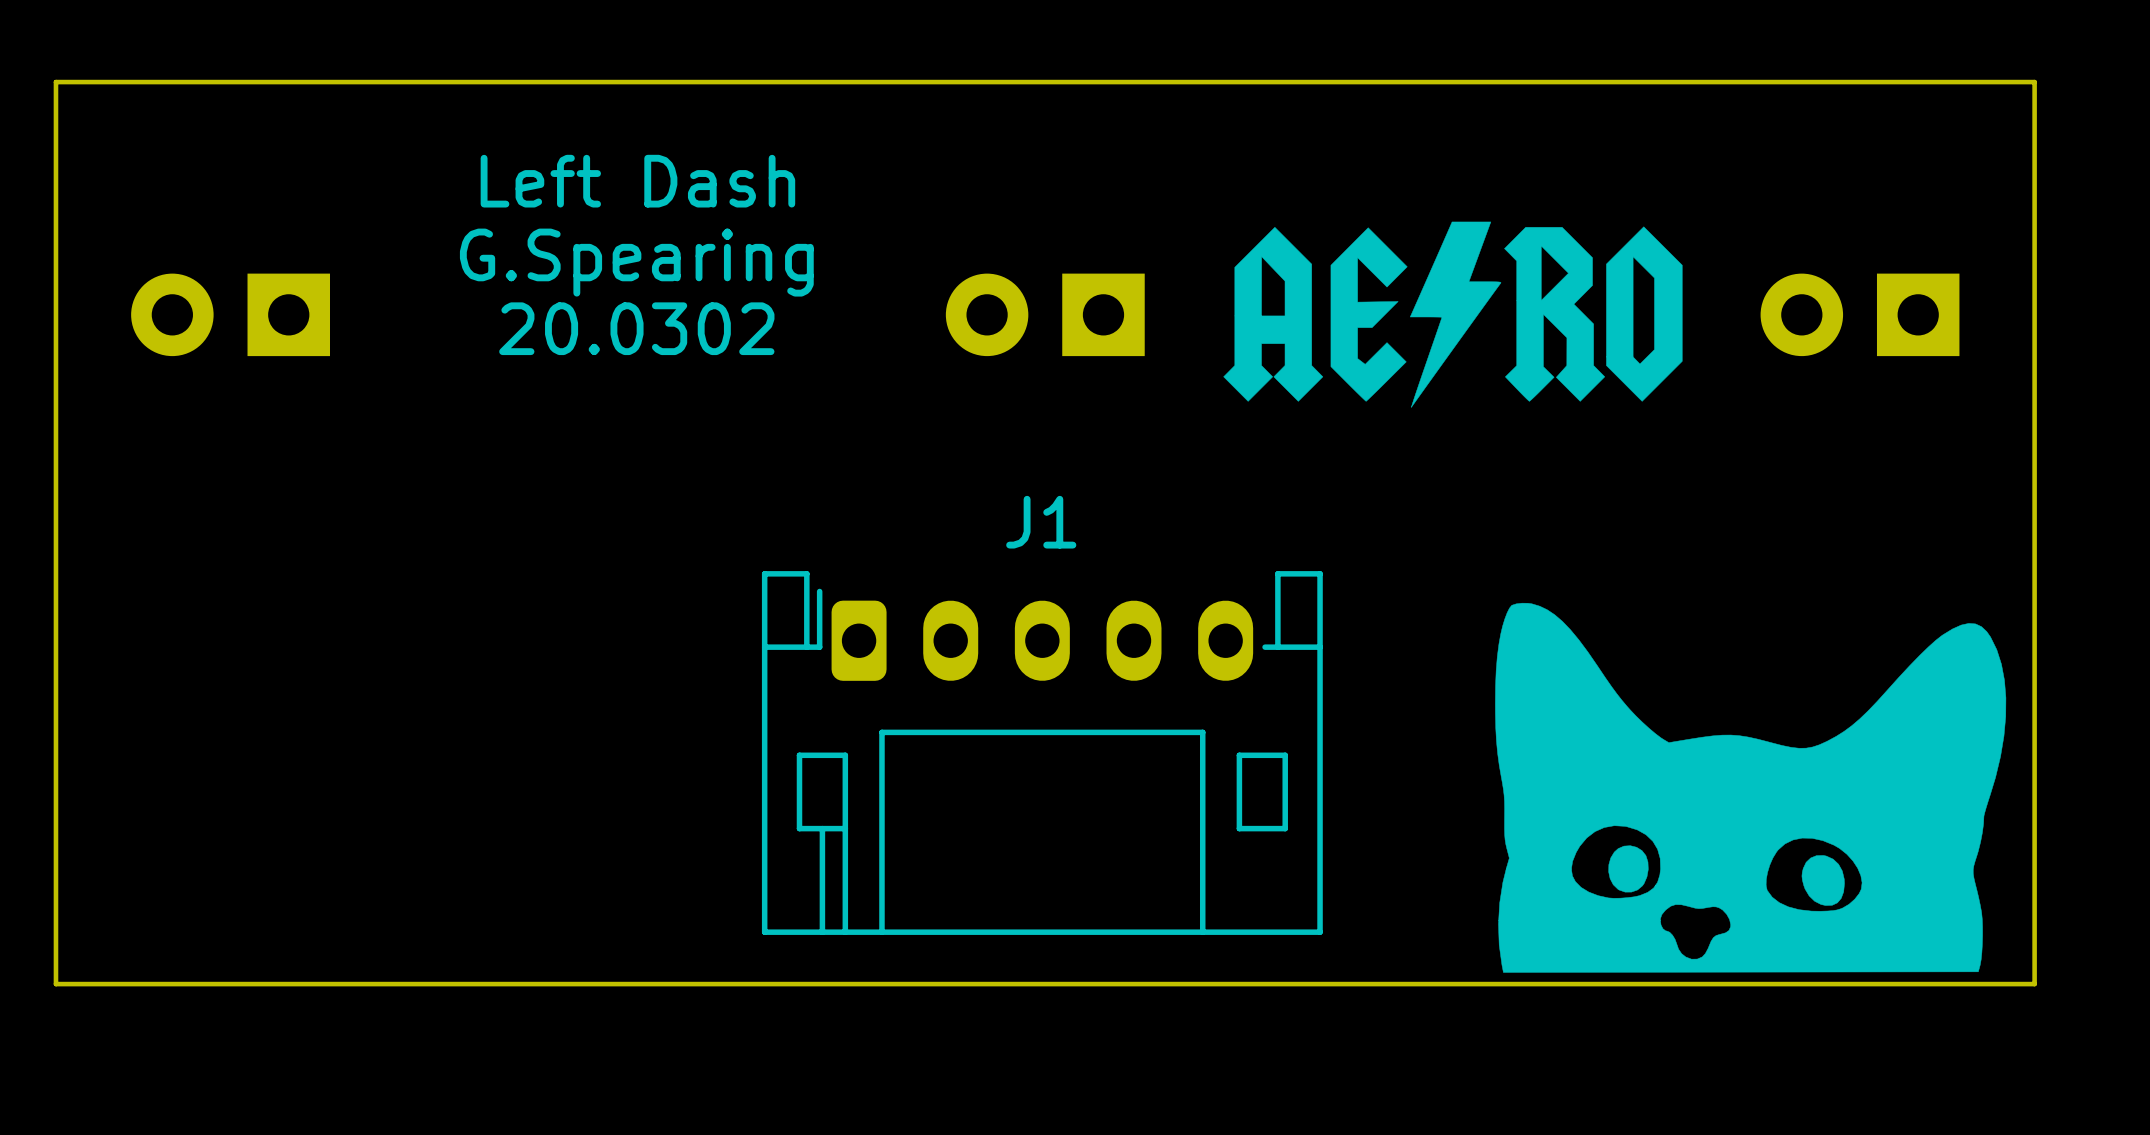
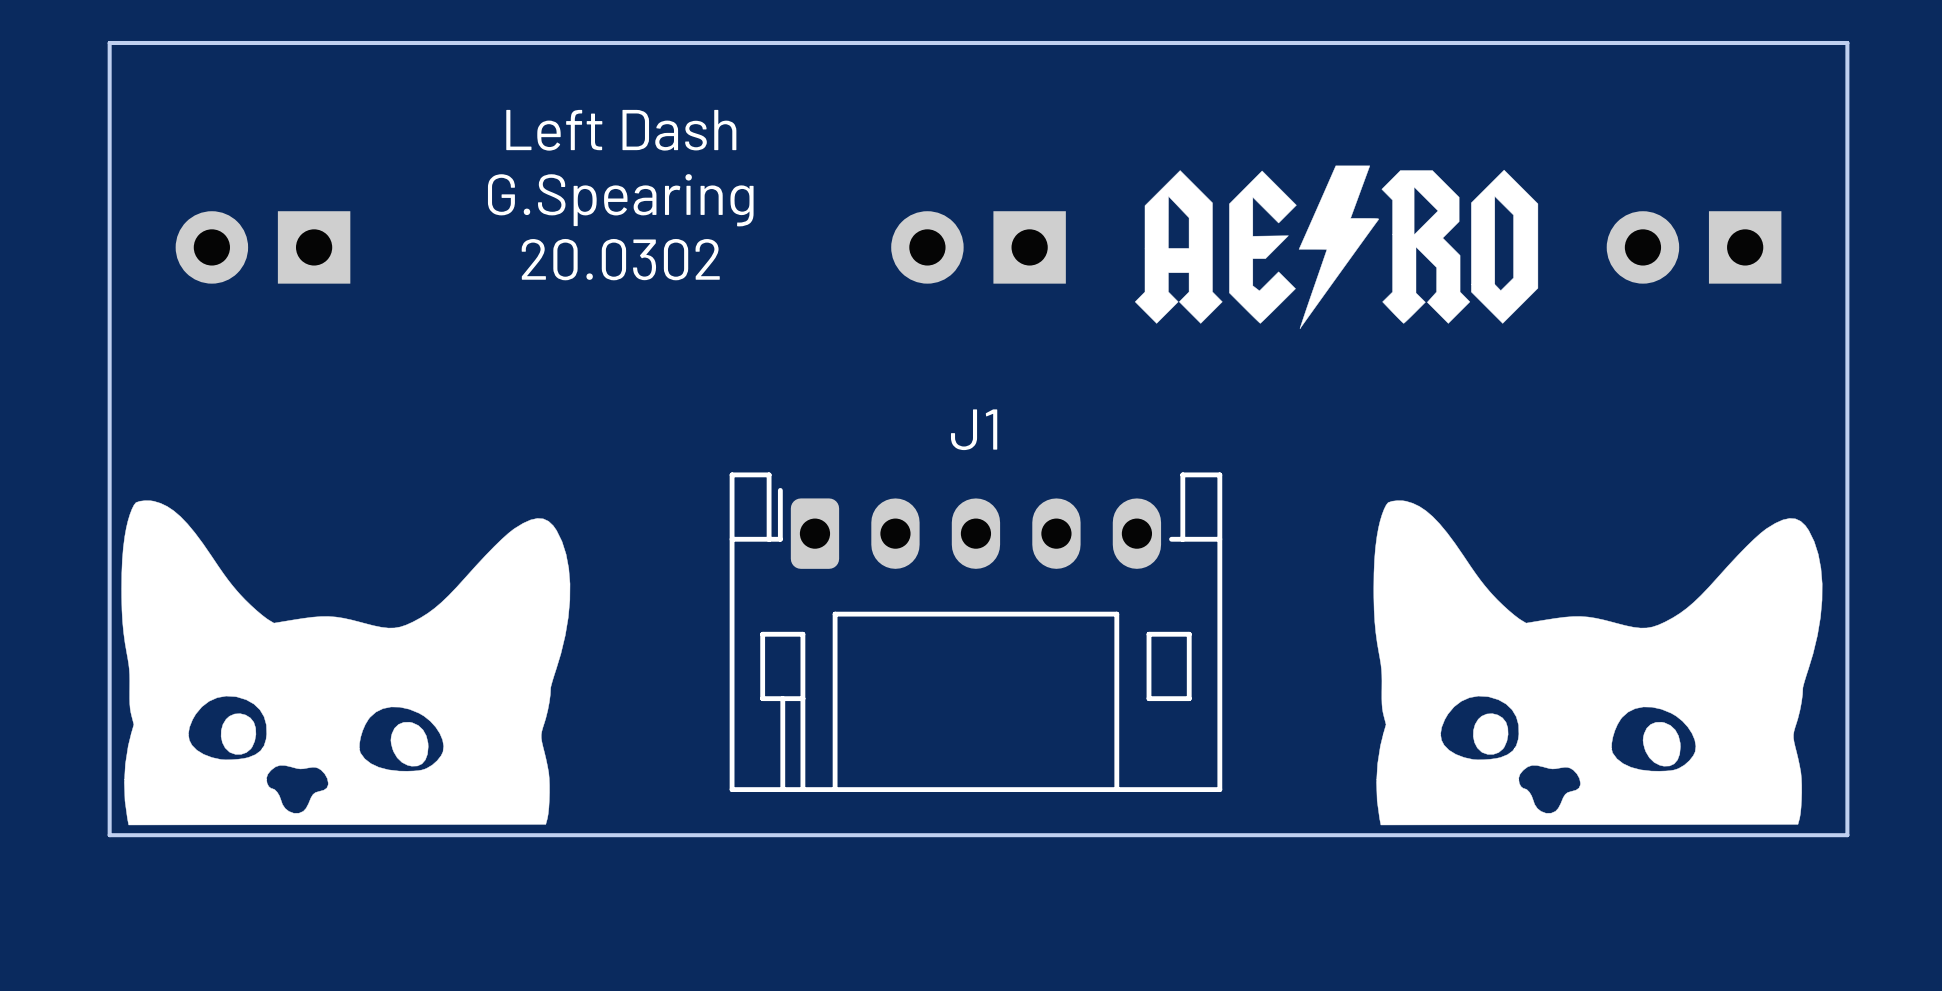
drawing: none -> [121, 500, 571, 826]

